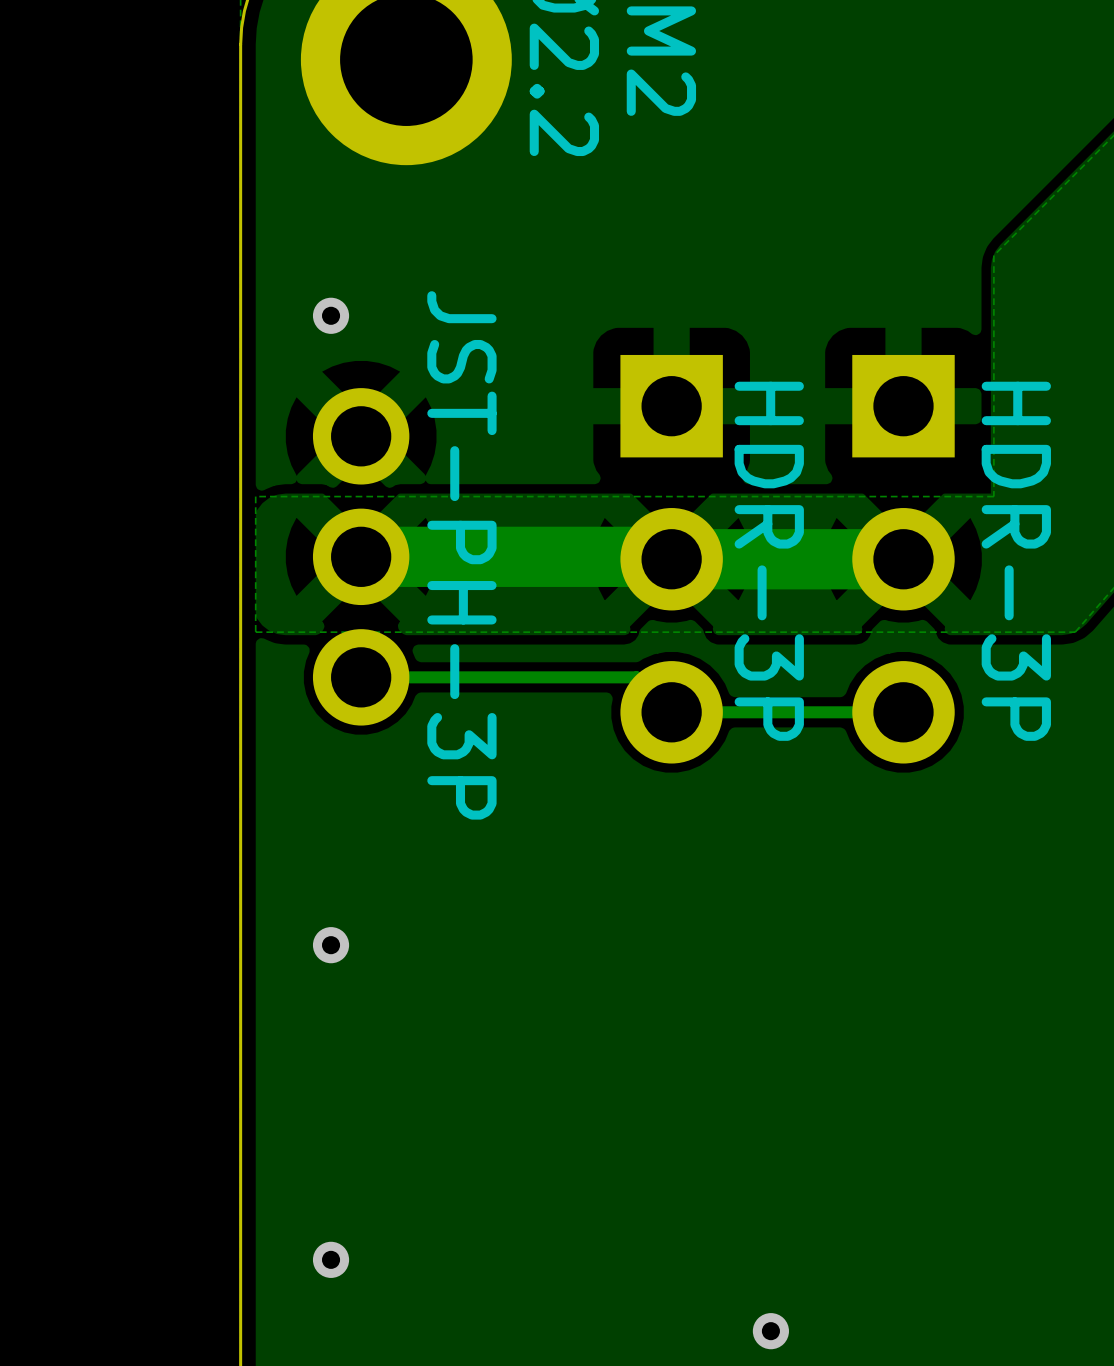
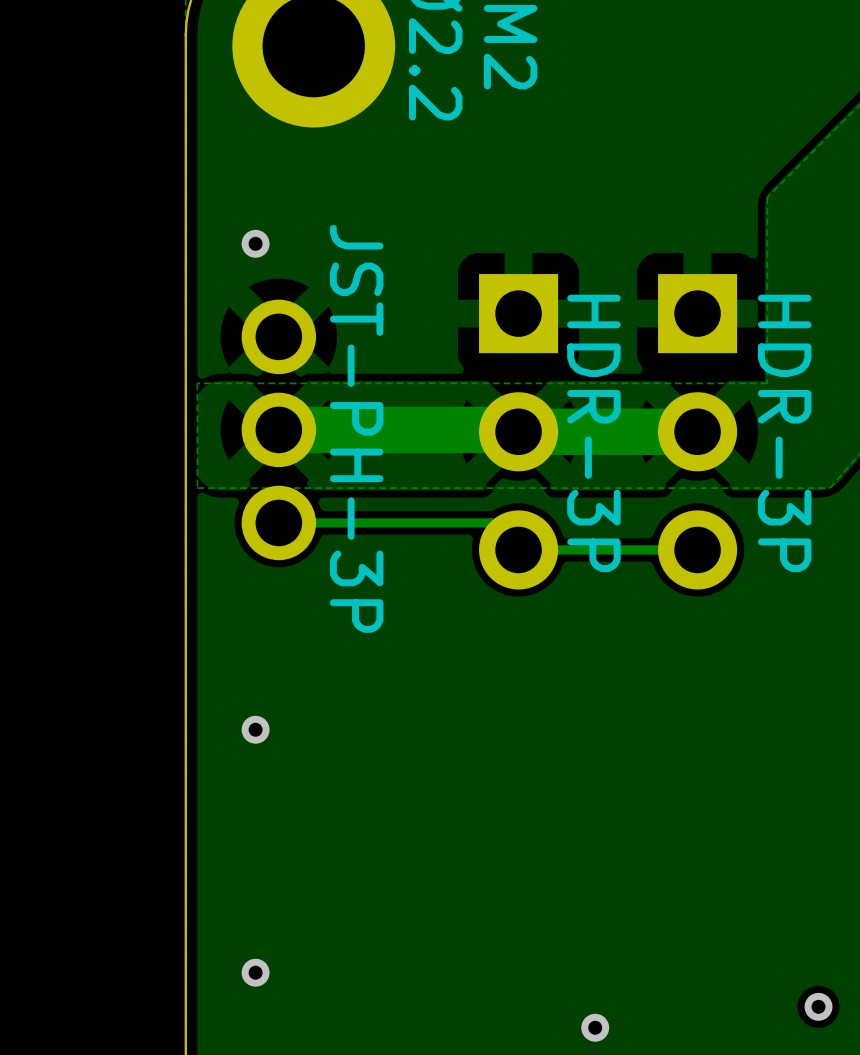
via: none -> (818, 1006)

